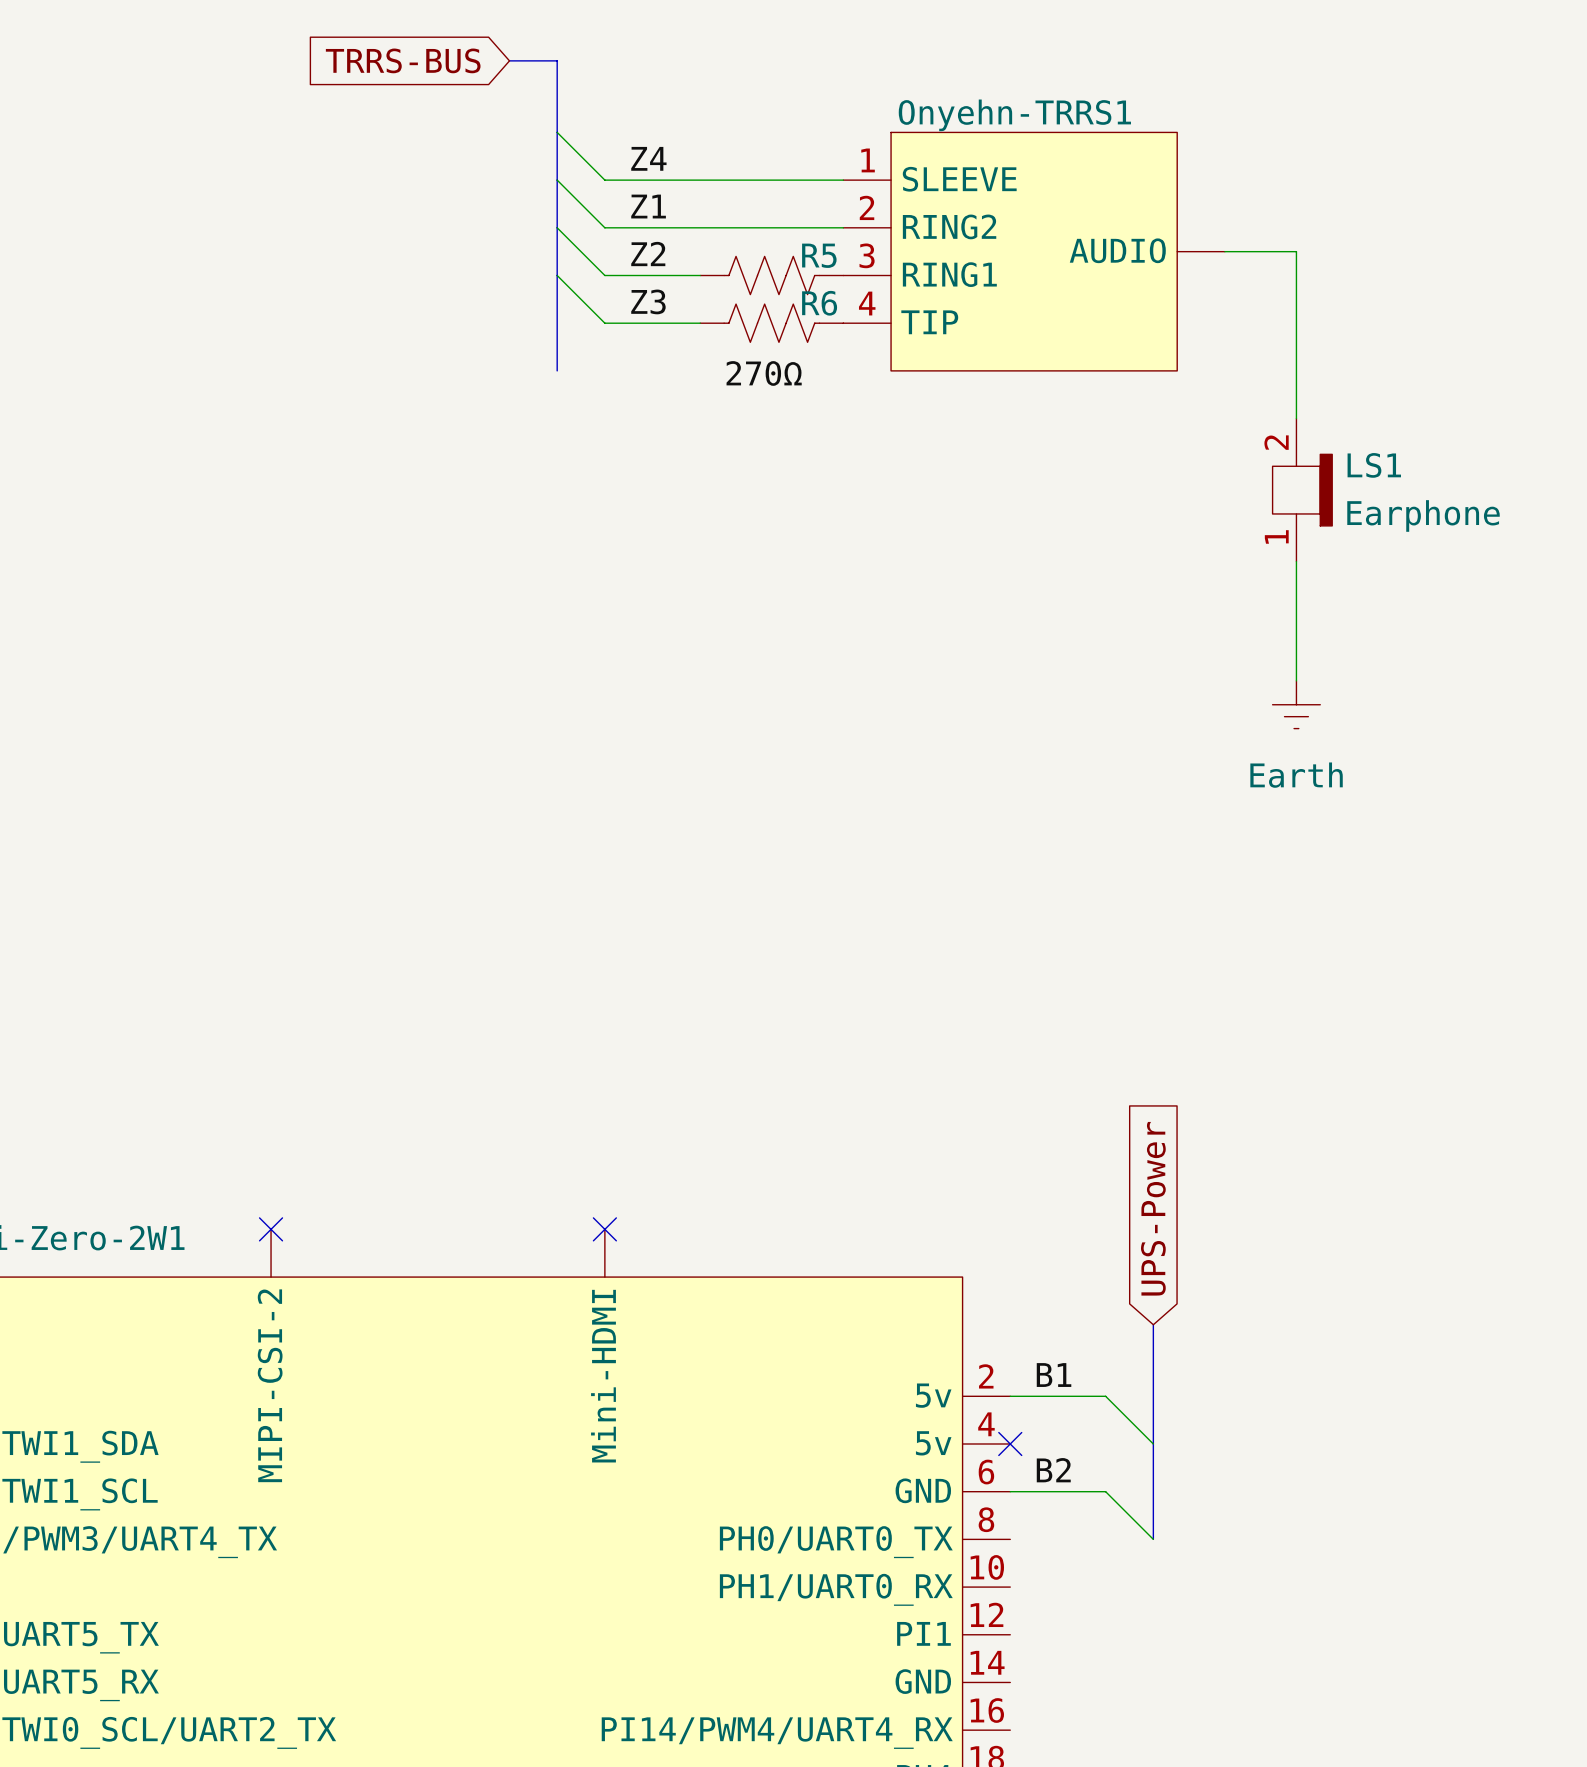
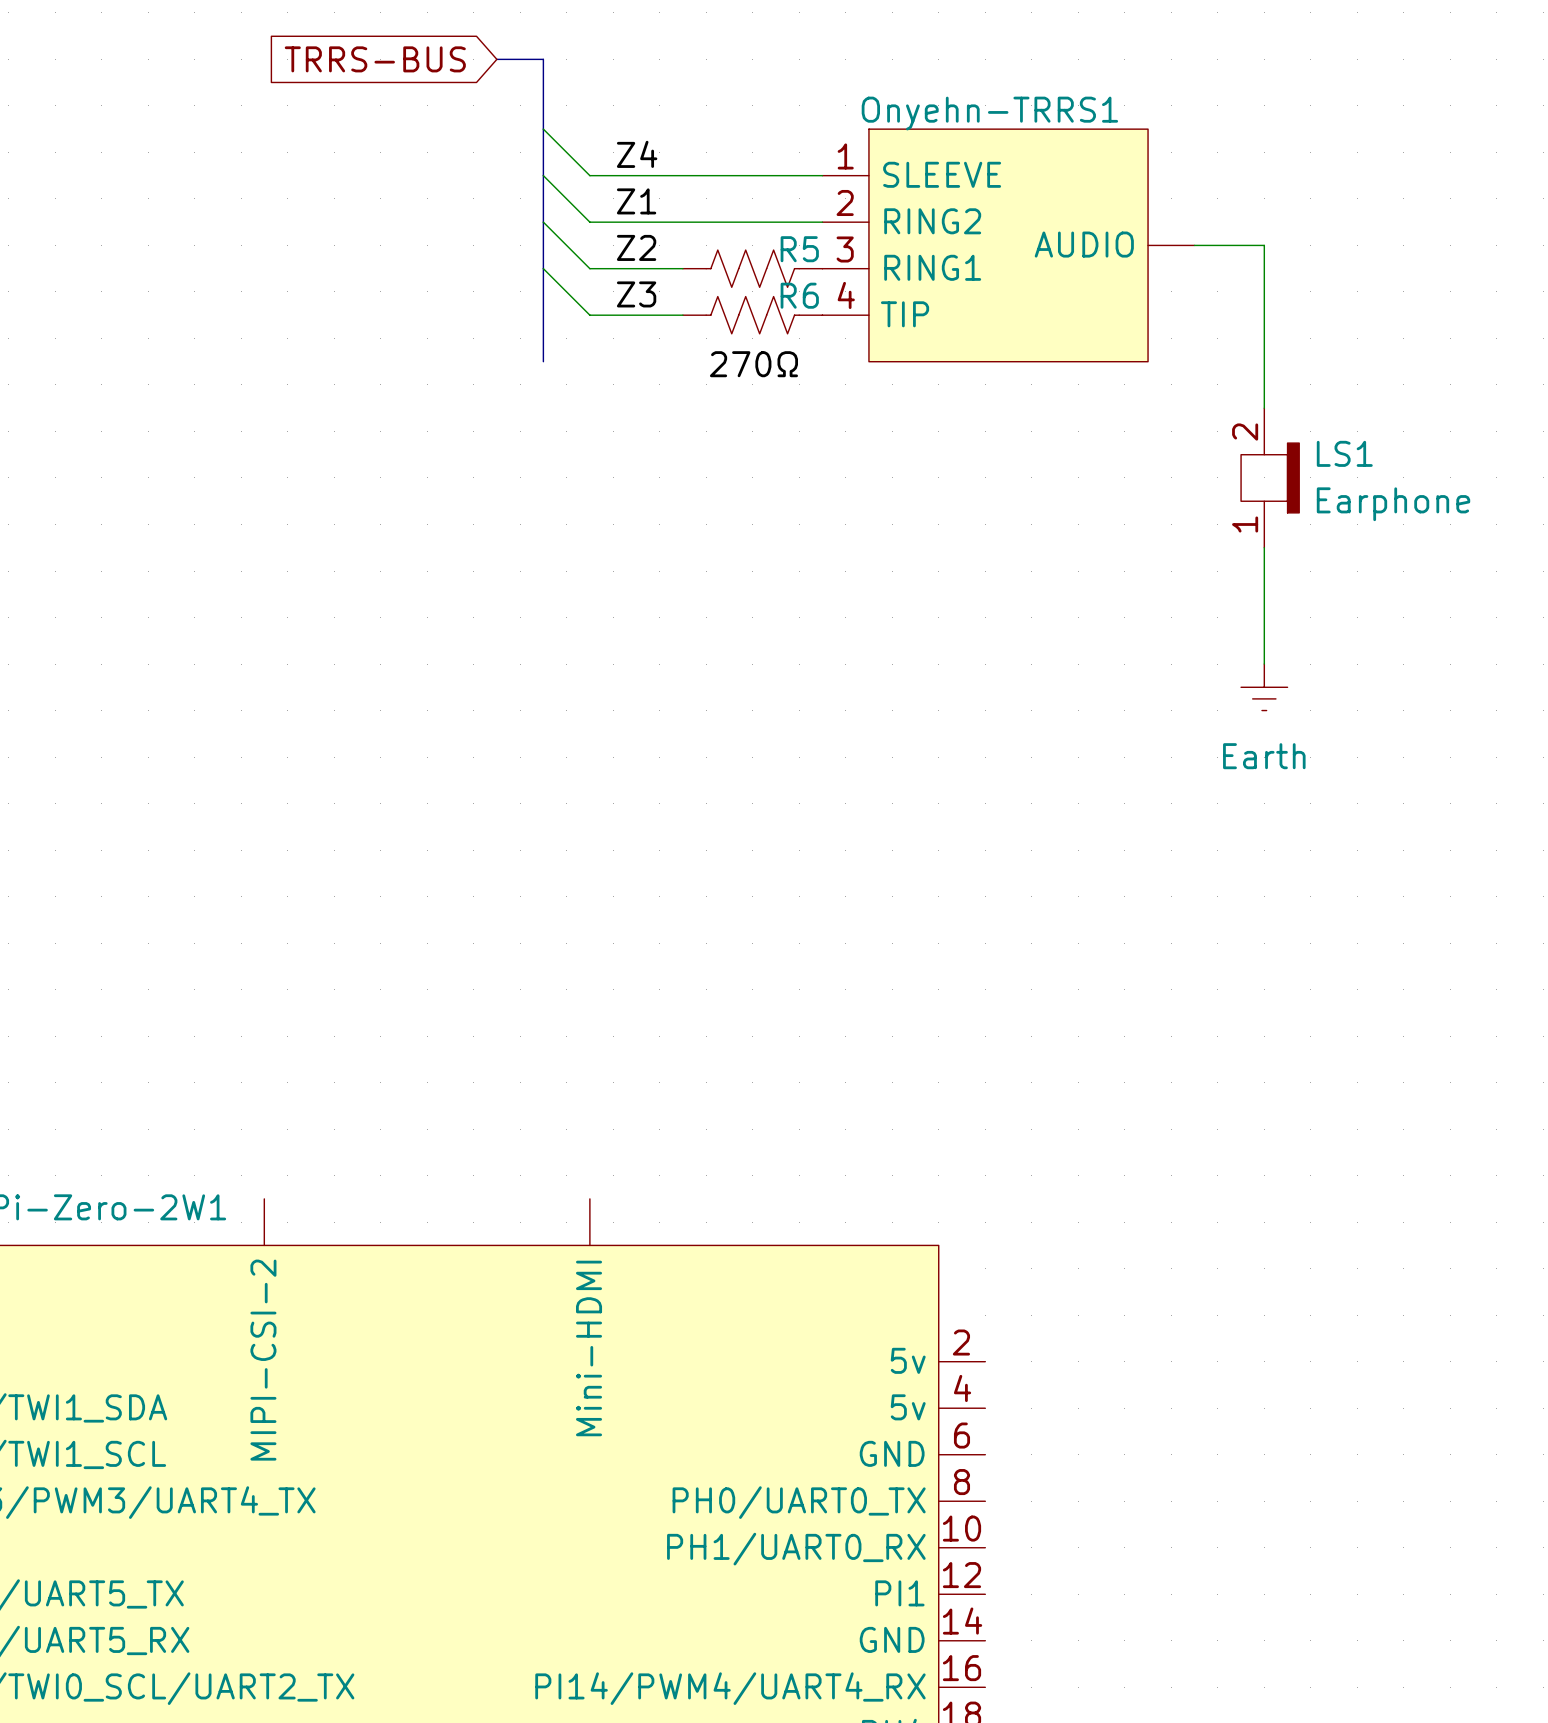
global label: UPS-Power (1153, 1208) -> none
no-connect mark: (271, 1229) -> none
no-connect mark: (604, 1229) -> none
bus: (1153, 1324) (1153, 1539) -> none
label: B1 (1054, 1375) -> none
wire: (1010, 1396) (1105, 1396) (1153, 1443) -> none
no-connect mark: (1010, 1443) -> none
label: B2 (1053, 1470) -> none
wire: (1010, 1491) (1105, 1491) (1153, 1539) -> none

